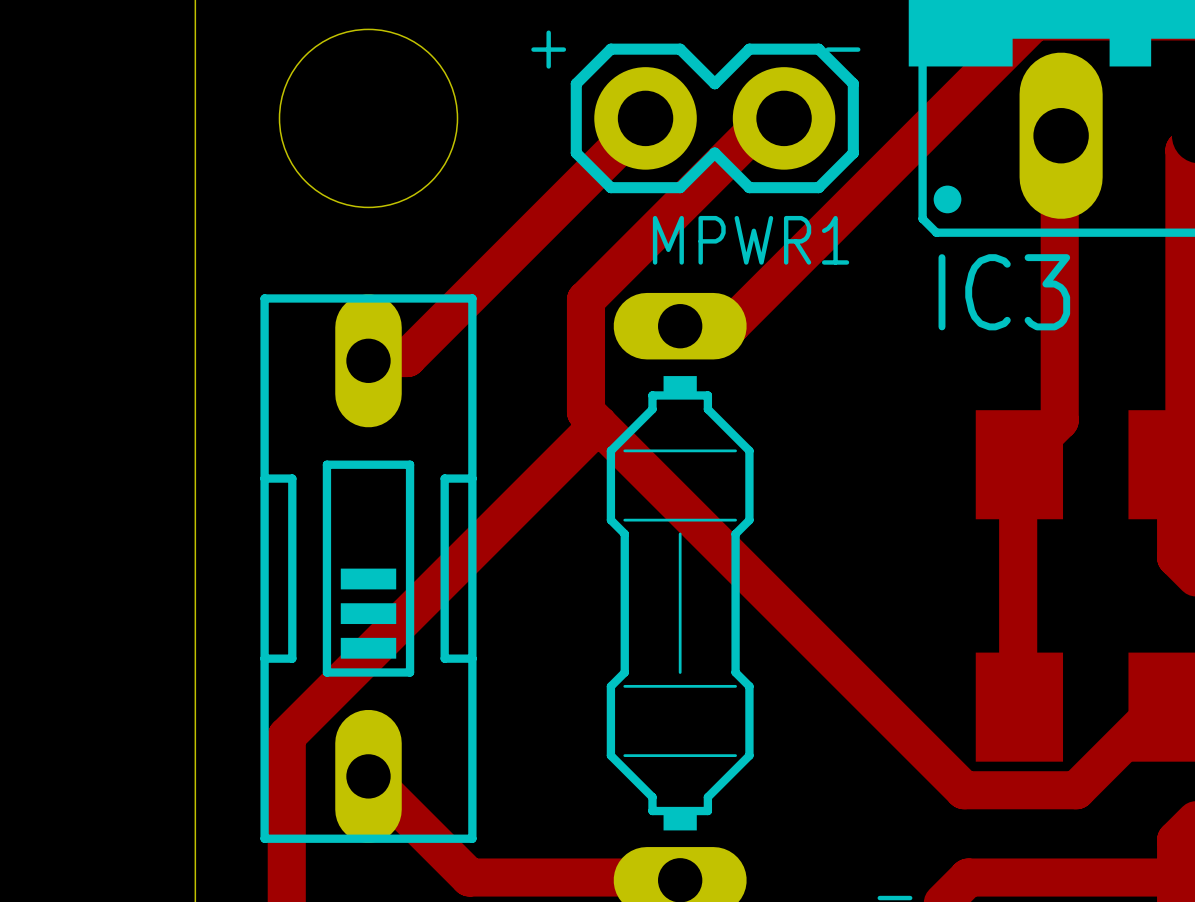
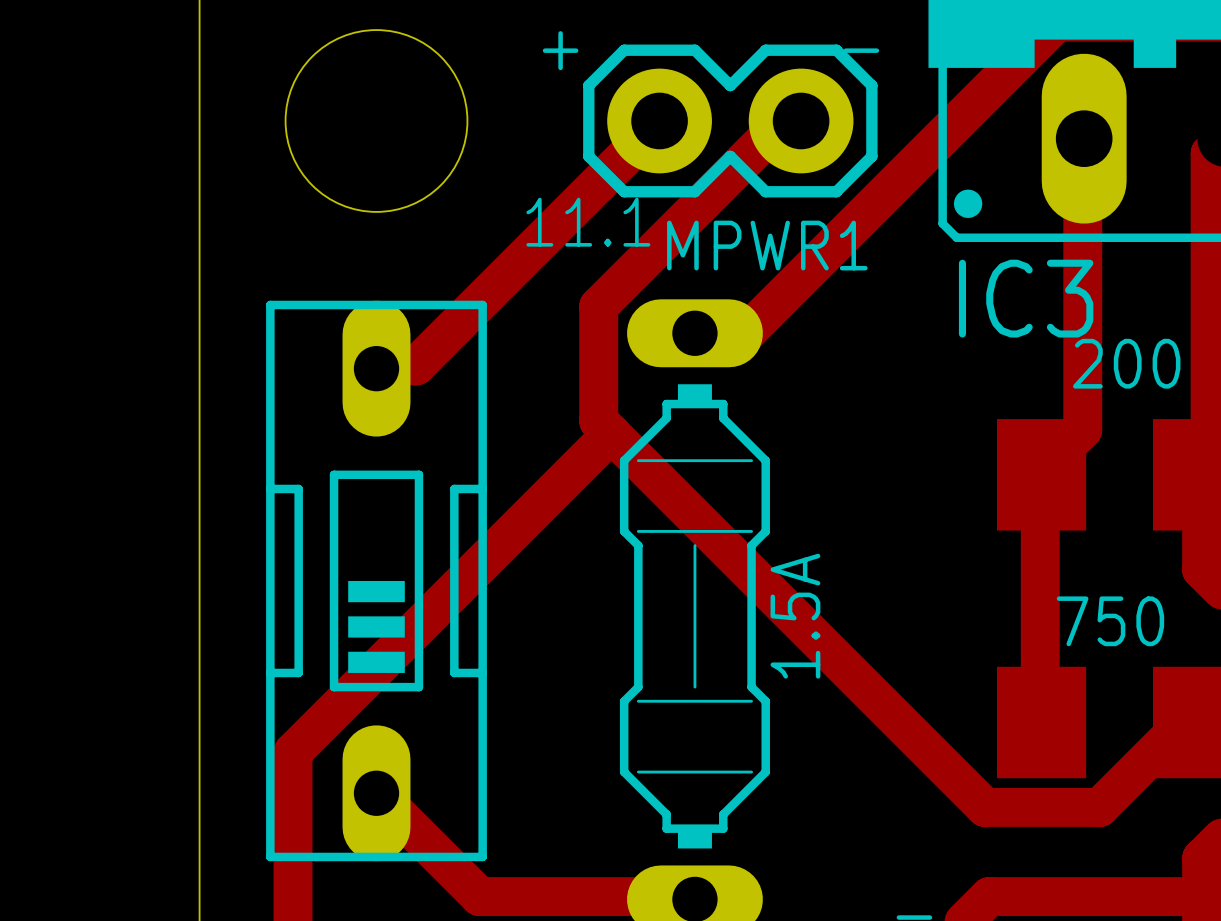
MPWR1 value: none -> 11.1 (588, 222)
part value: none -> 200 (1126, 363)
part value: none -> 1.5A (795, 616)
part value: none -> 750 (1110, 621)

